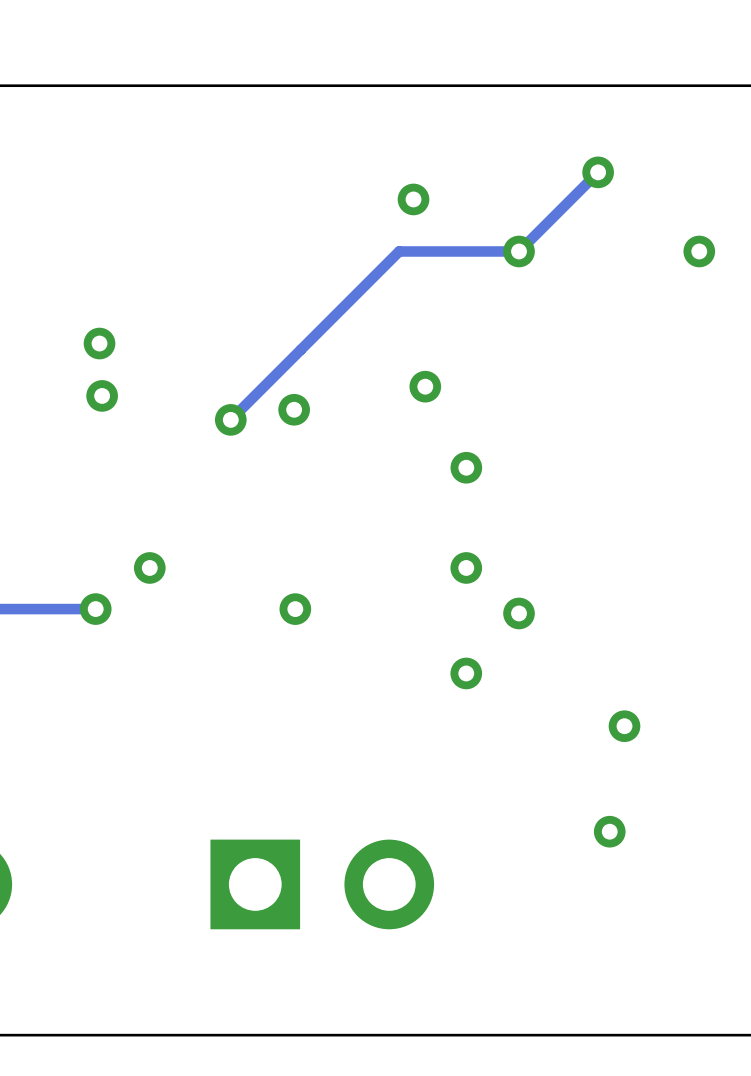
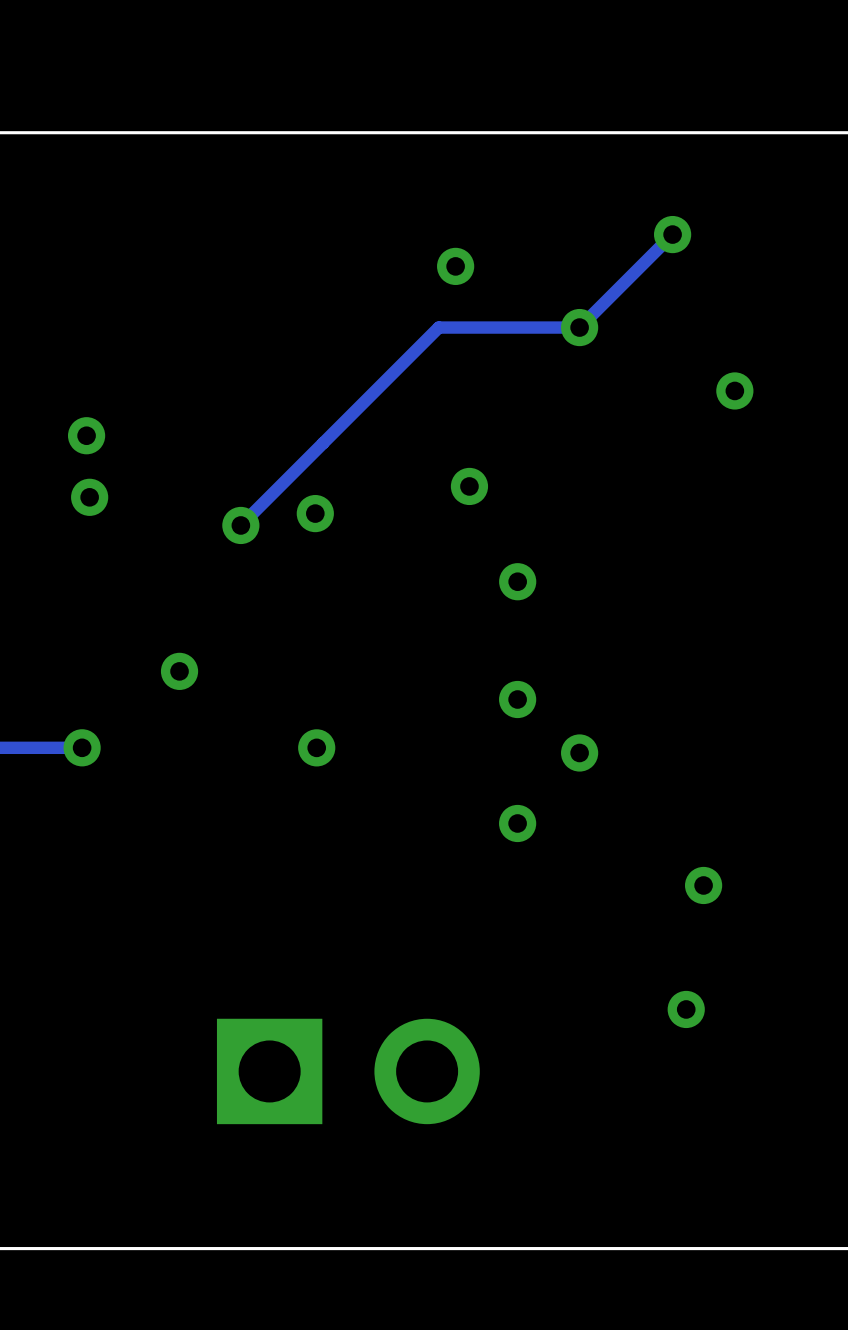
via position: (699, 251) -> (734, 390)
via position: (149, 567) -> (179, 671)

